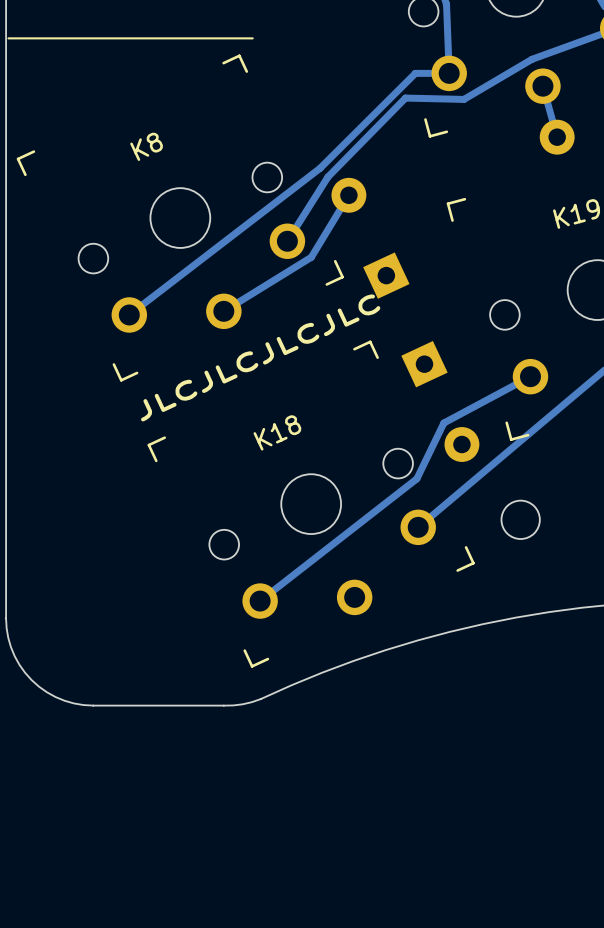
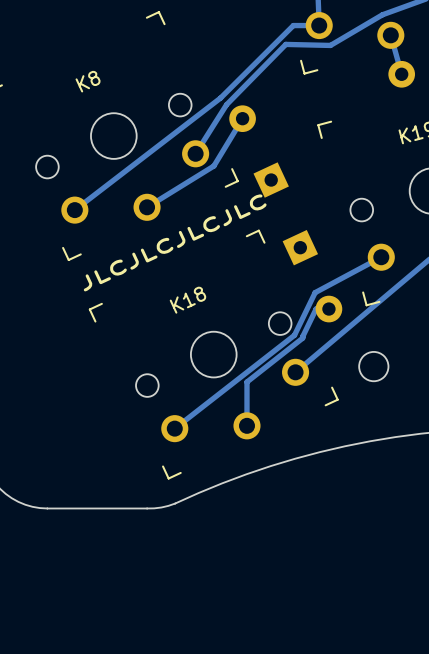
track: none -> (328, 309) (316, 309) (302, 338) (246, 382) (246, 425)

